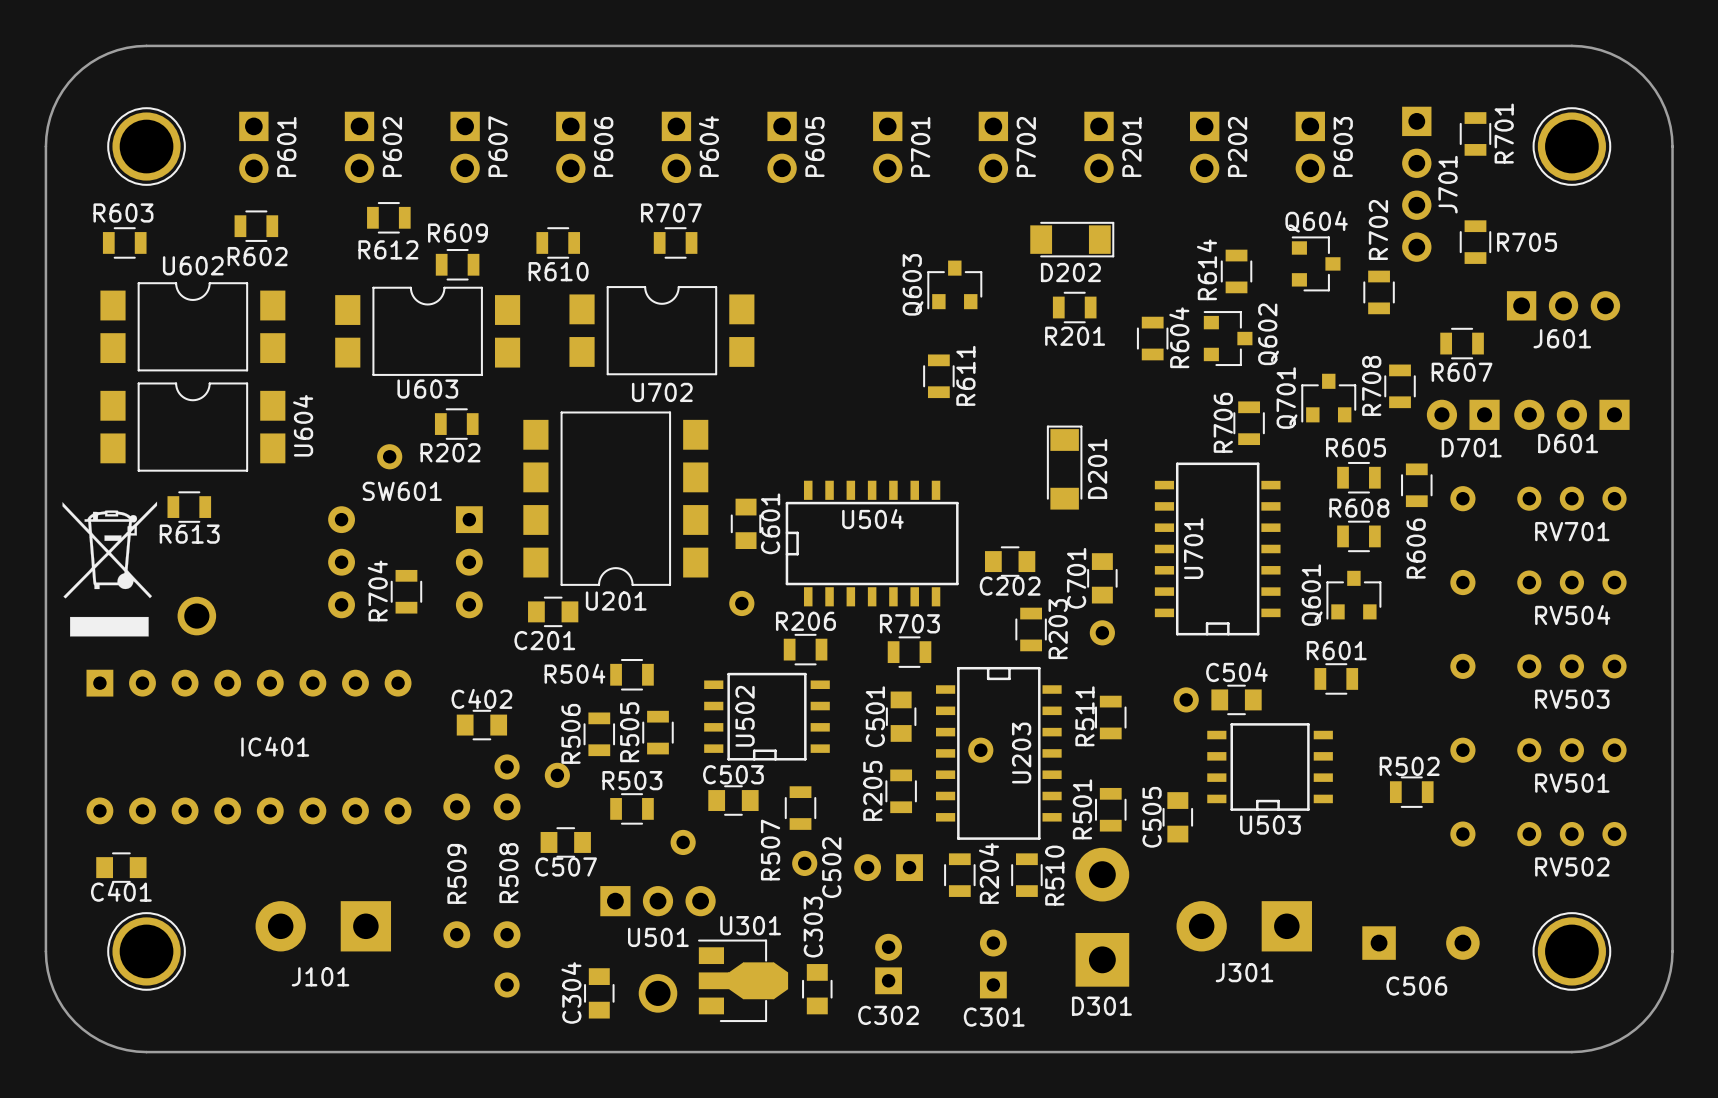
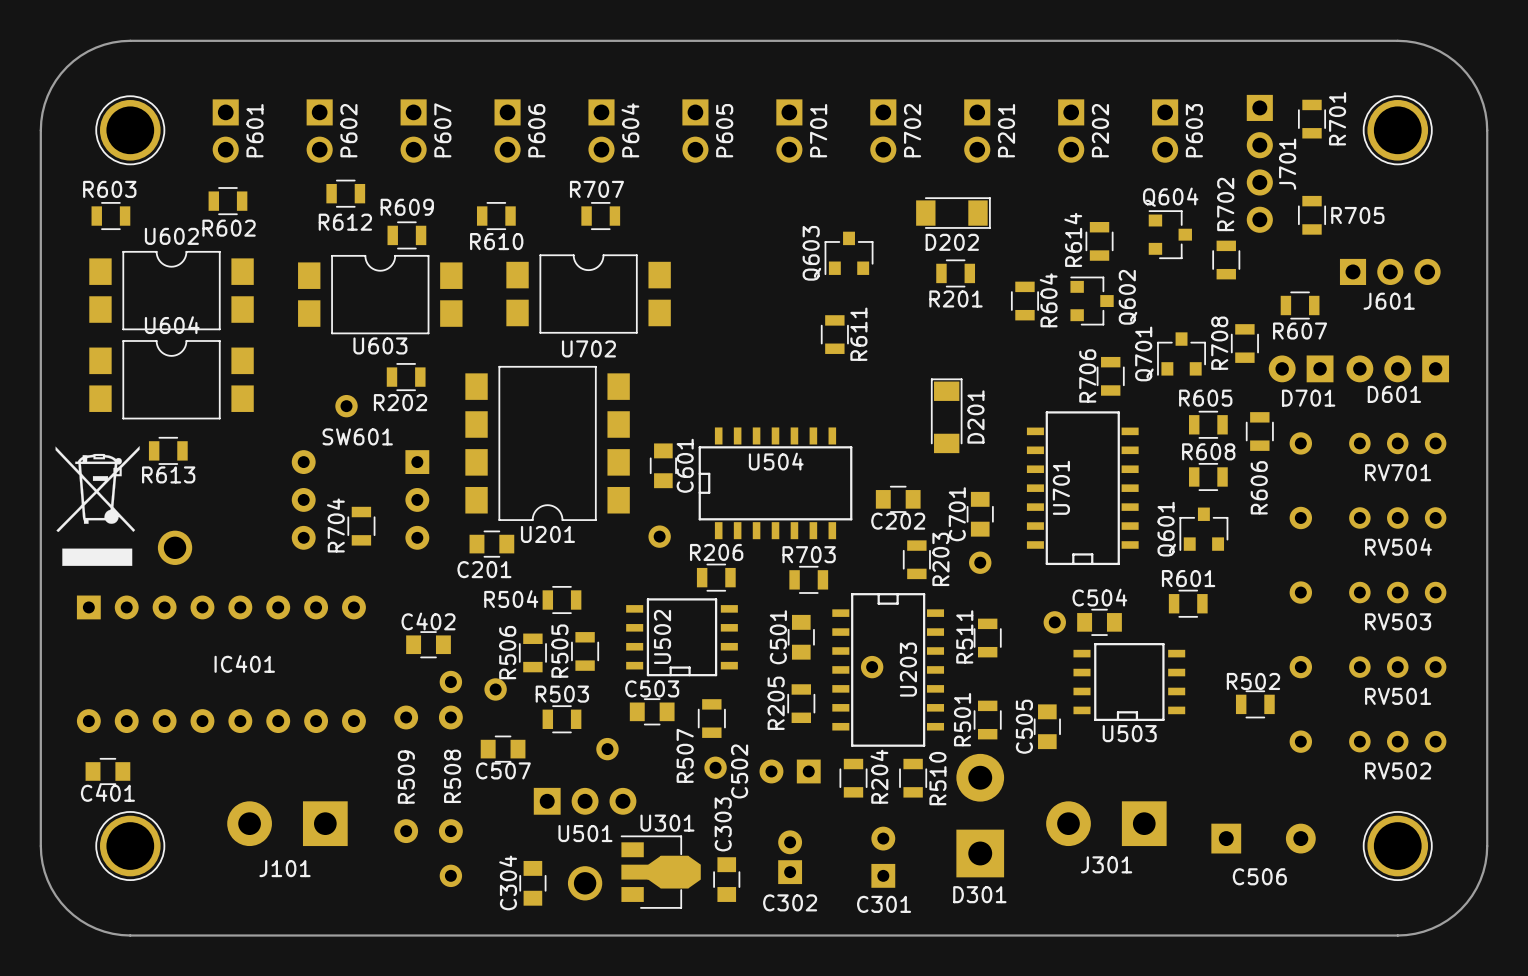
U604 name rotation: 0° (303, 425) -> 90° clockwise (172, 325)
U604 name position: U604 (303, 425) -> U604 (172, 325)

